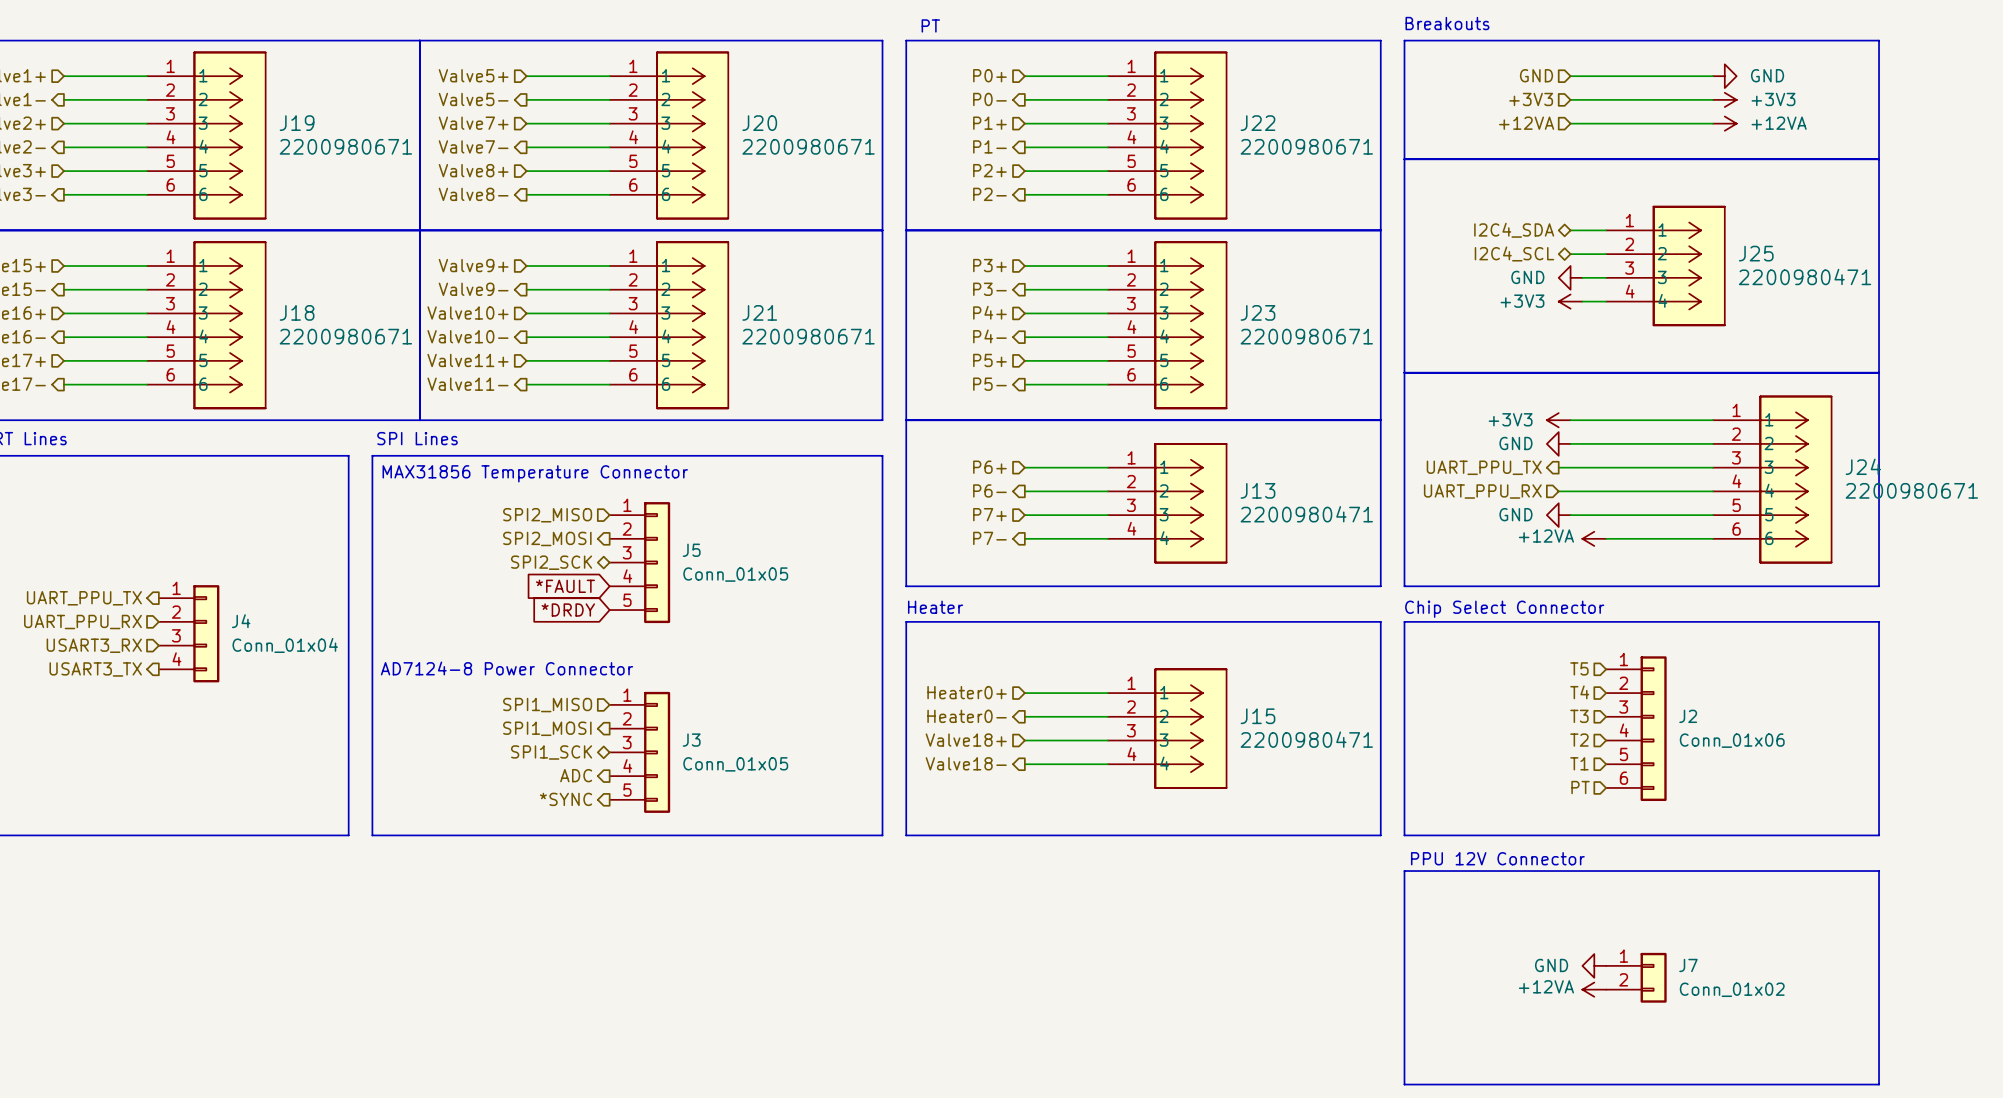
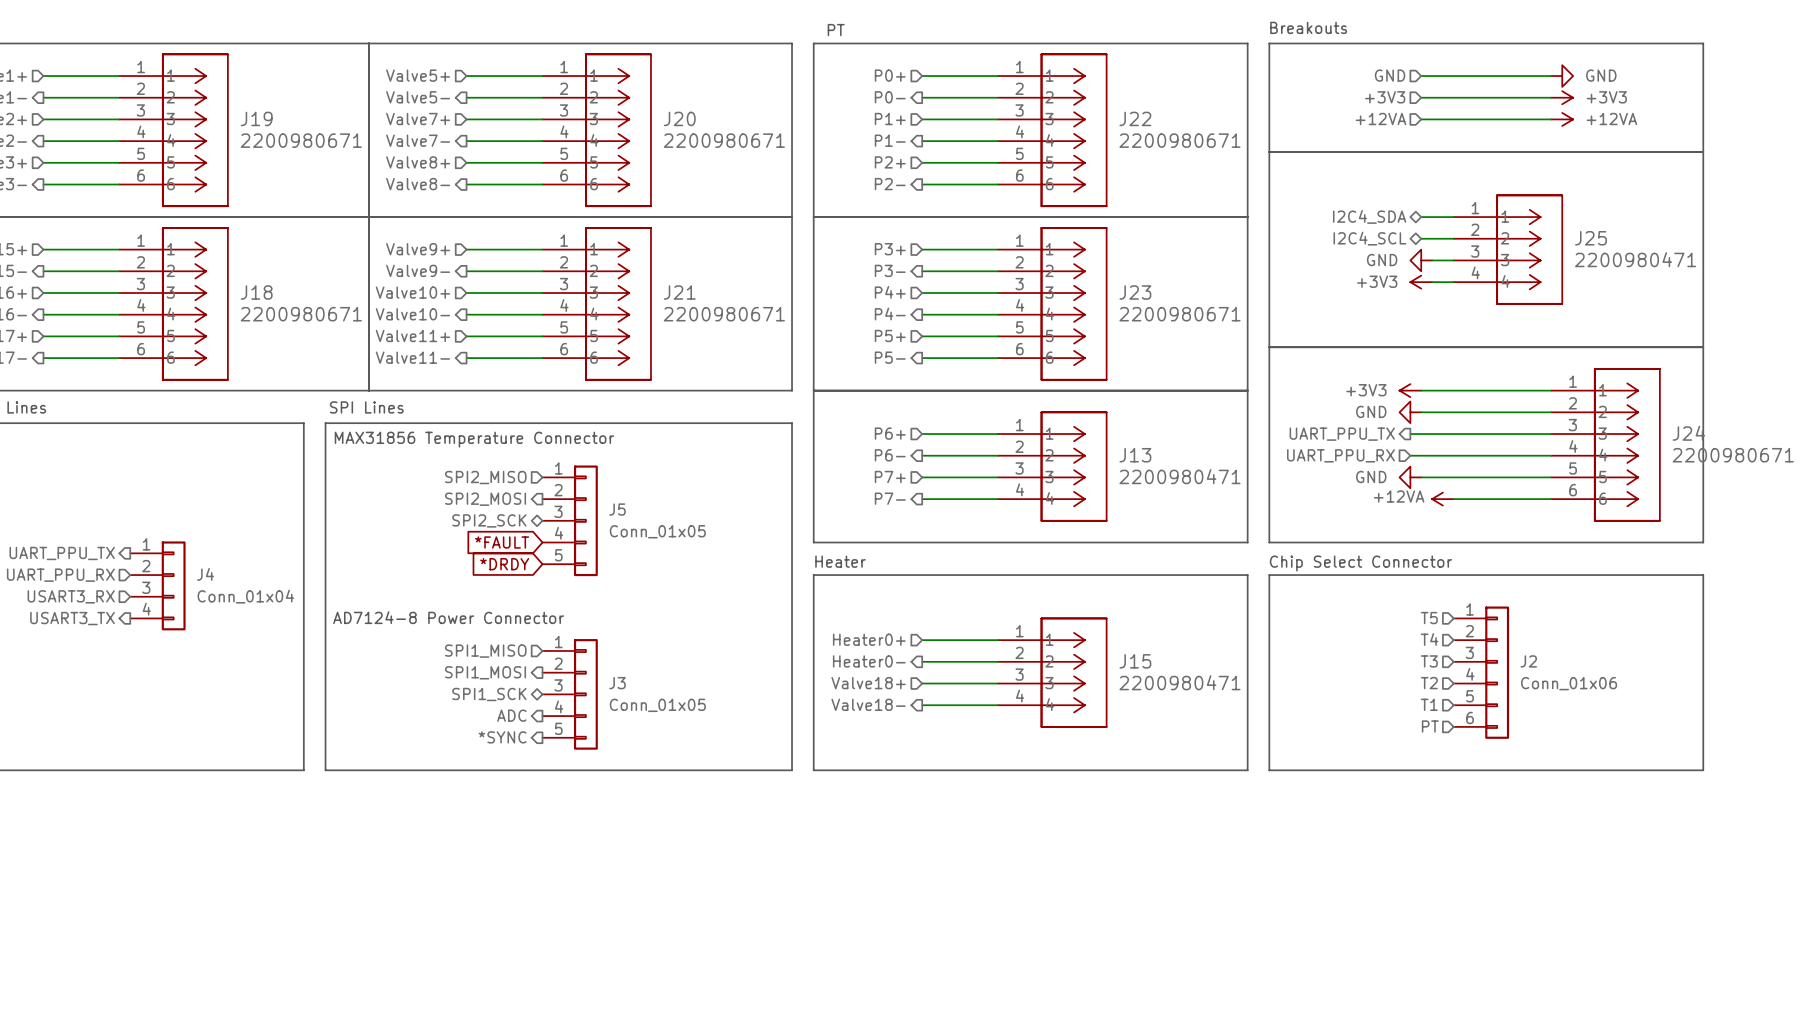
text: PPU 12V Connector (1497, 858) -> none
line: (1404, 871) (1879, 871) (1879, 1084) (1404, 1084) (1404, 871) -> none
power symbol: GND (1594, 965) -> none
J7: Conn_01x02 (1636, 977) -> none
power symbol: +12VA (1594, 989) -> none

